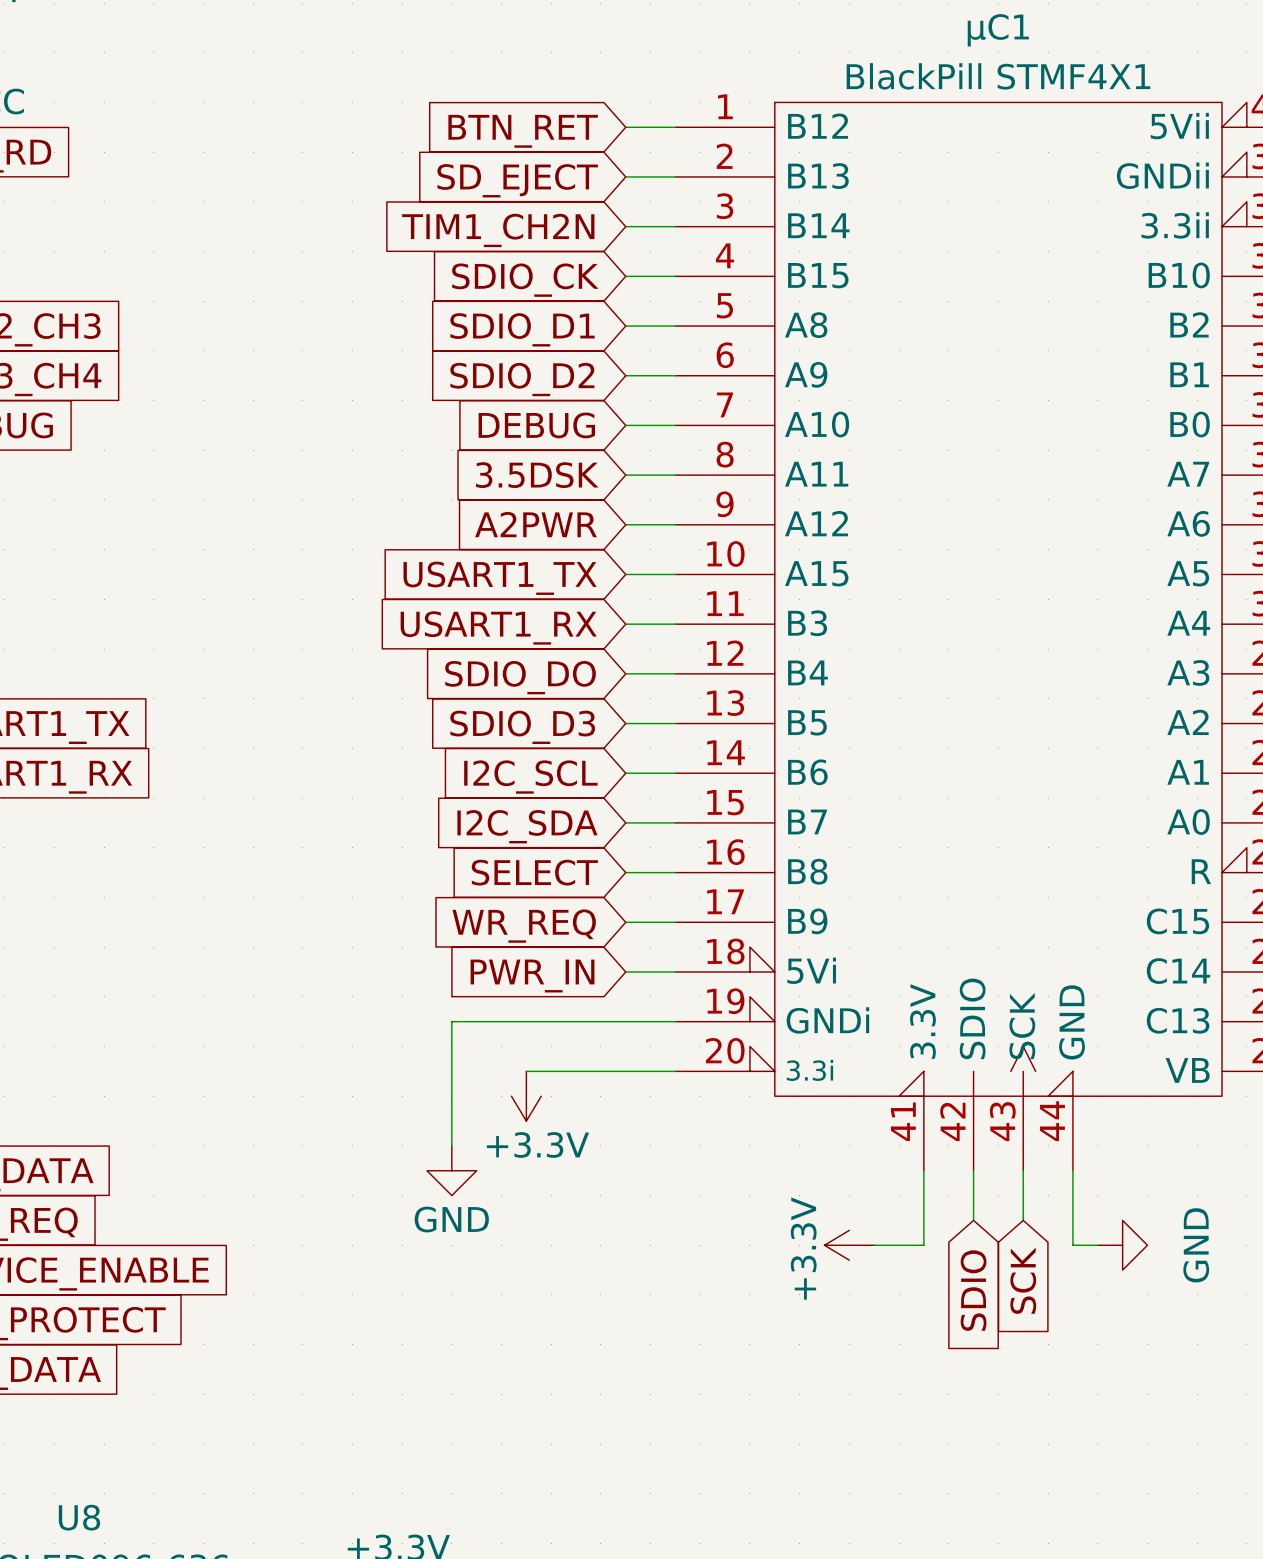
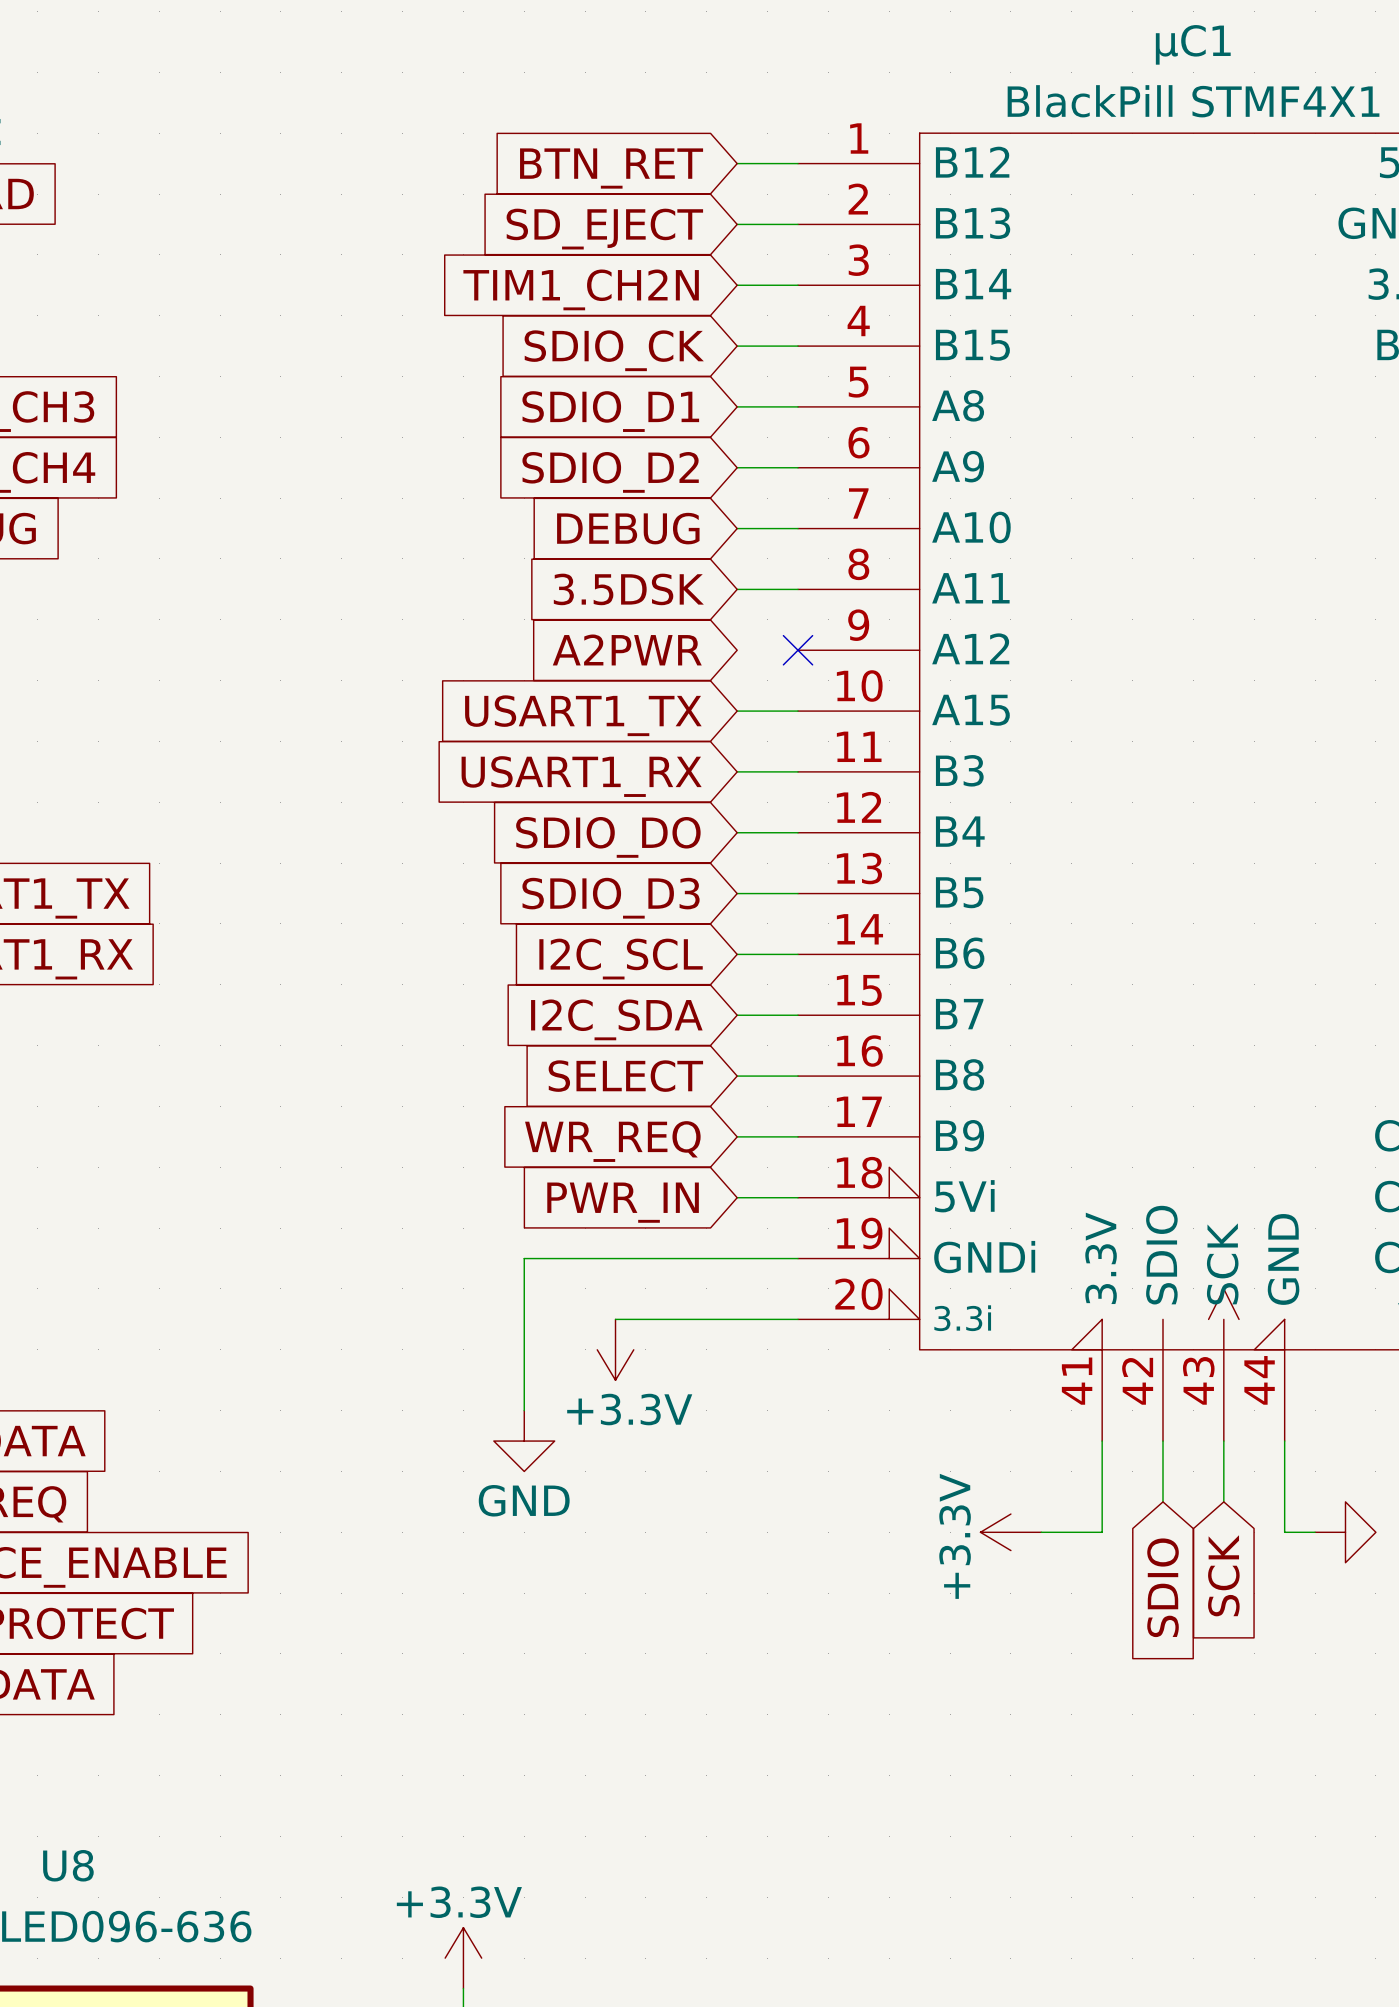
wire: (625, 524) (675, 524) -> none
no-connect mark: none -> (798, 650)

